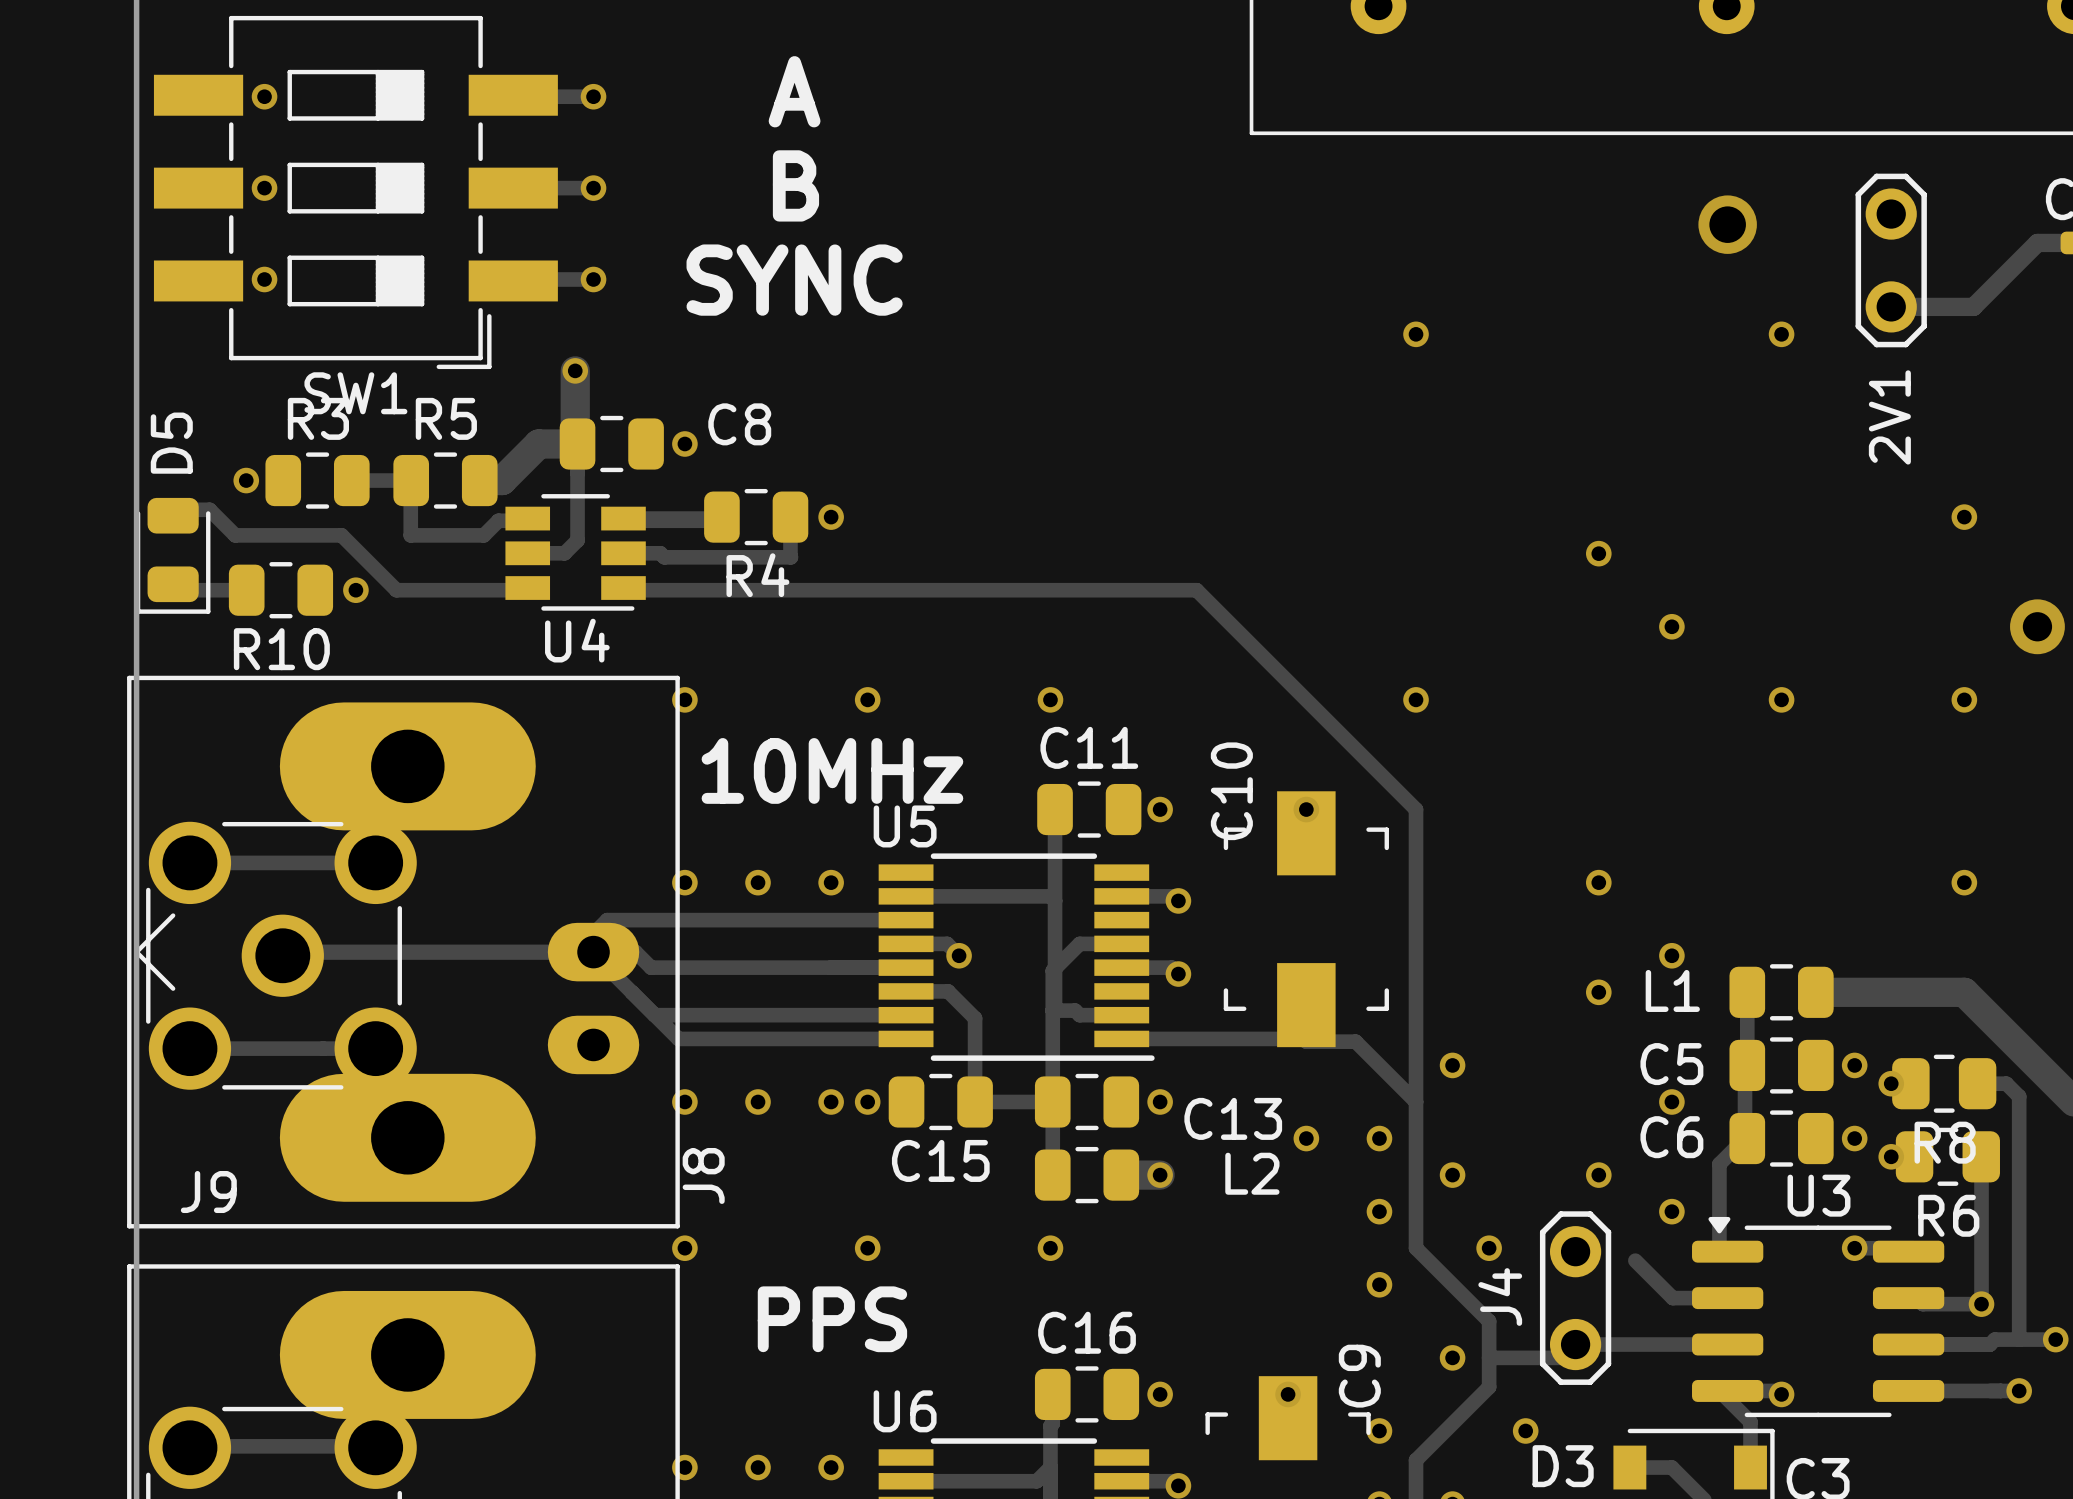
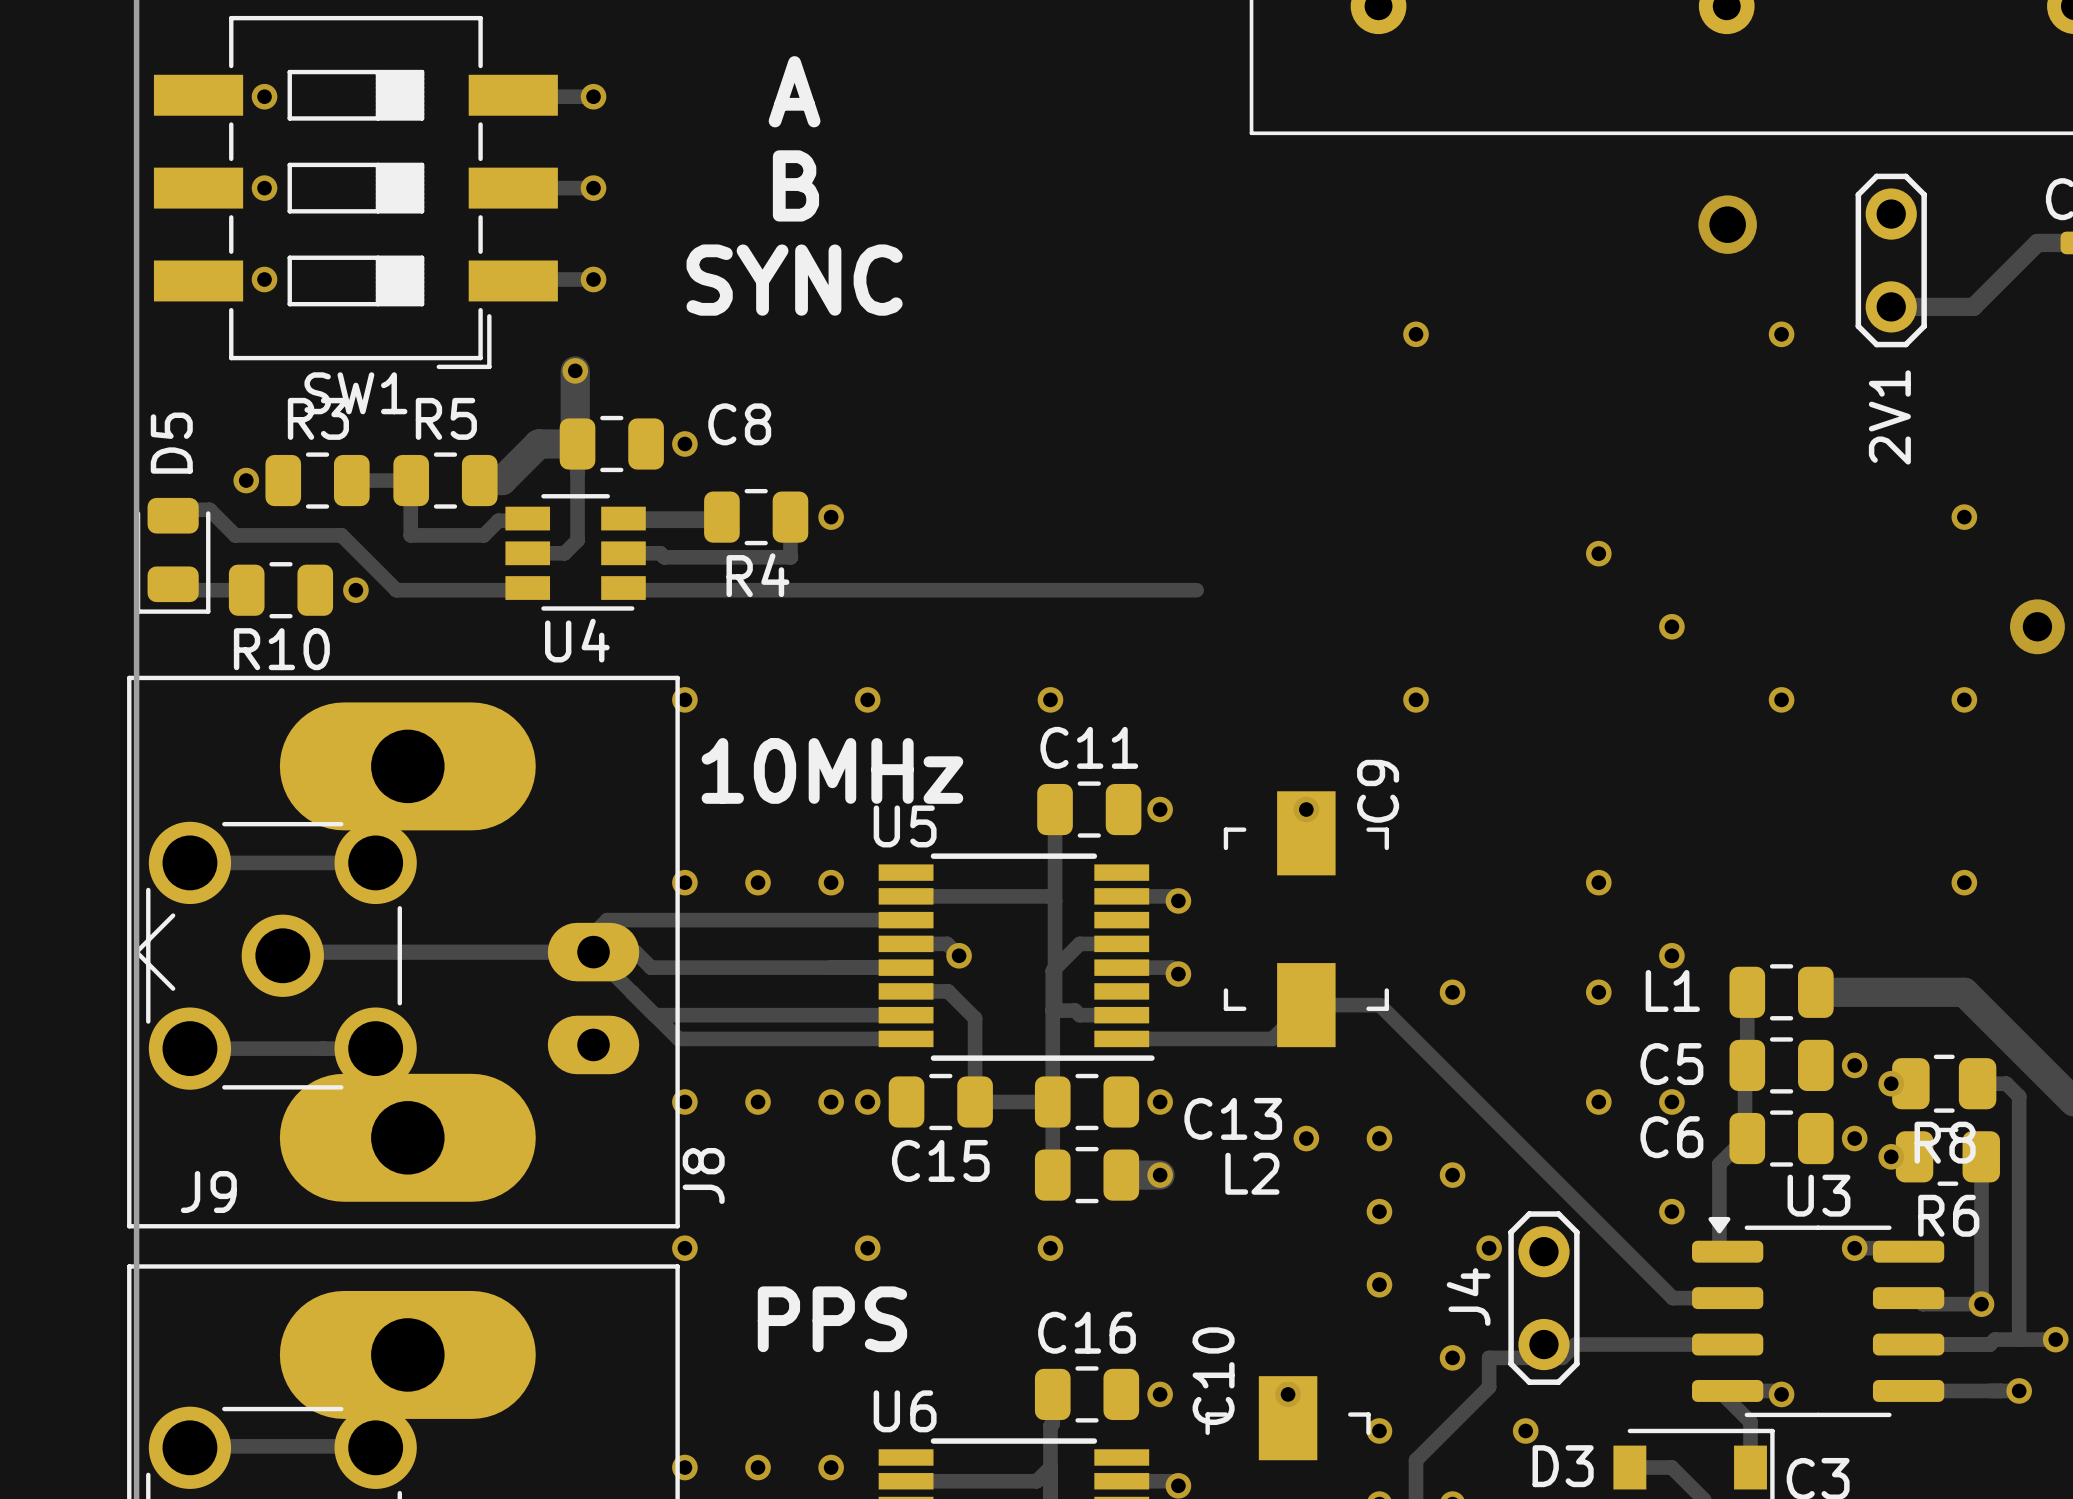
track: (1196, 590) (1416, 809) (1416, 1248) (1489, 1321) (1489, 1357) -> none
C10 name: C10 (1231, 791) -> C9 (1378, 791)
track: (1272, 1038) (1303, 1038) (1306, 1041) (1355, 1041) (1416, 1101) -> (1272, 1038) (1306, 1005) (1379, 1005) (1635, 1260)
via position: (1452, 1065) -> (1452, 992)
via position: (1598, 1175) -> (1598, 1101)
J4 position: (1575, 1298) -> (1543, 1298)
C9 name: C9 (1359, 1376) -> C10 (1213, 1376)

